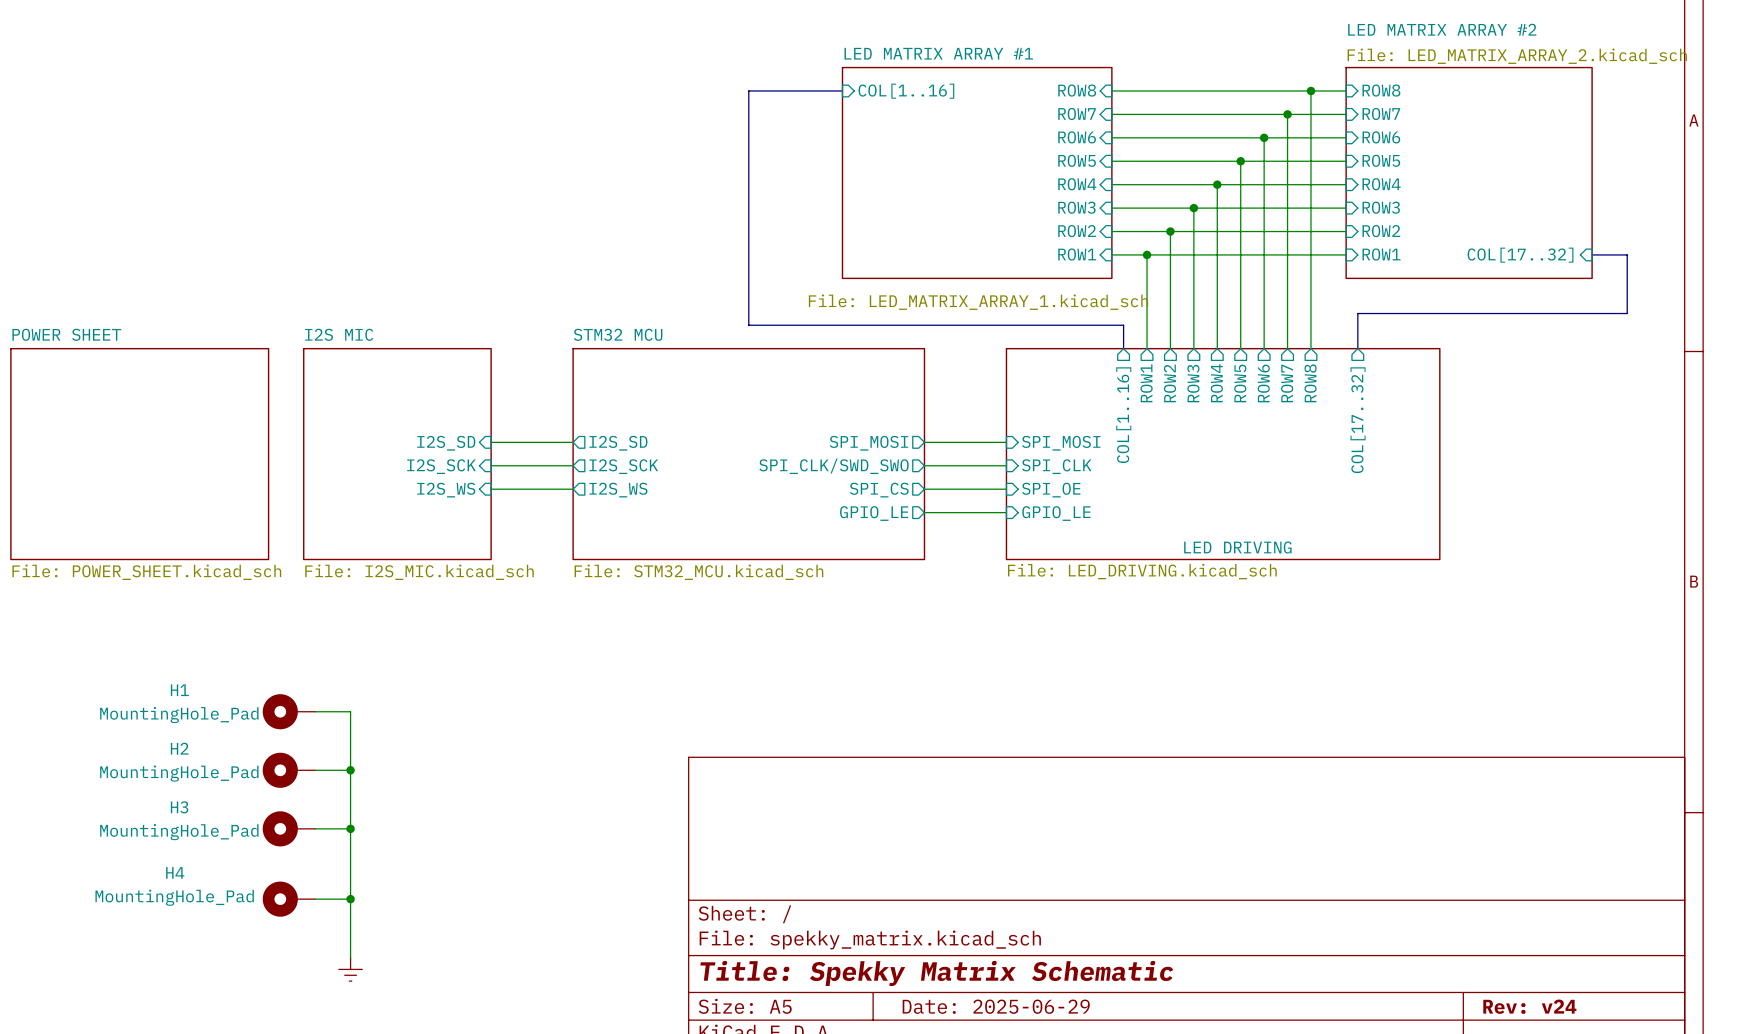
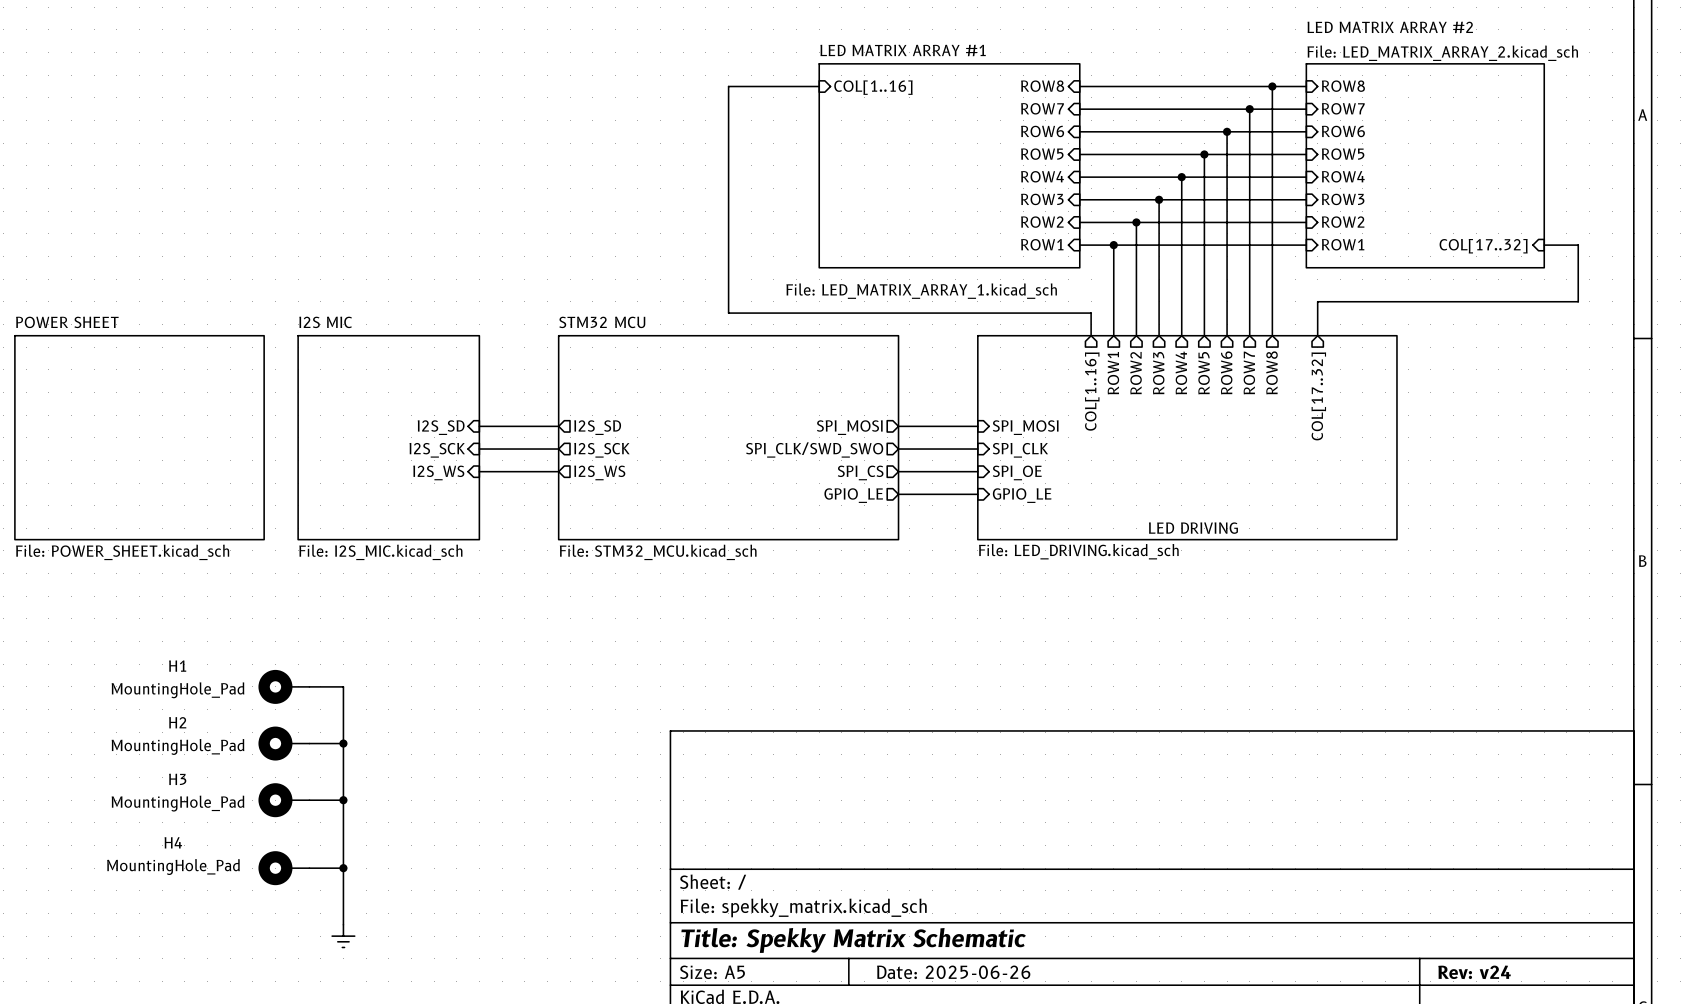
title block: Date: 2025-06-29 (996, 1006) -> Date: 2025-06-26 (953, 972)

